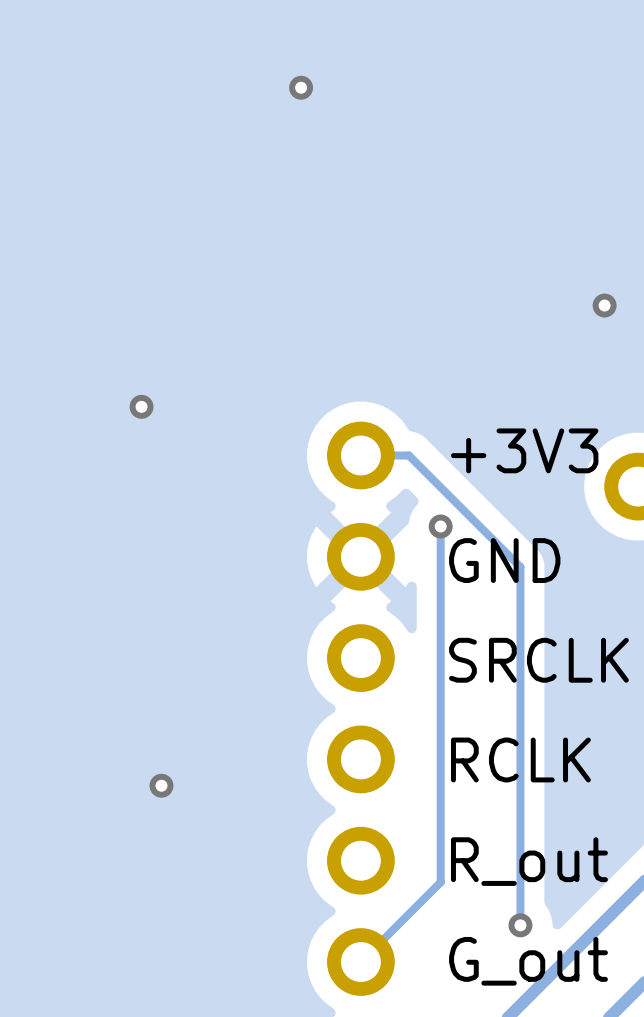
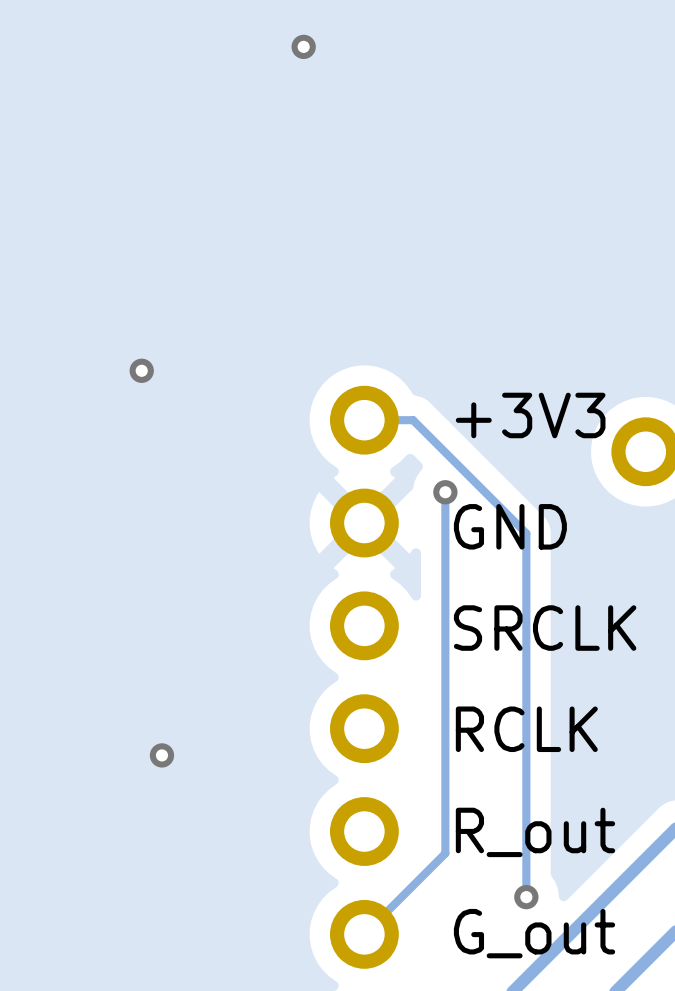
via: (604, 305) -> none

